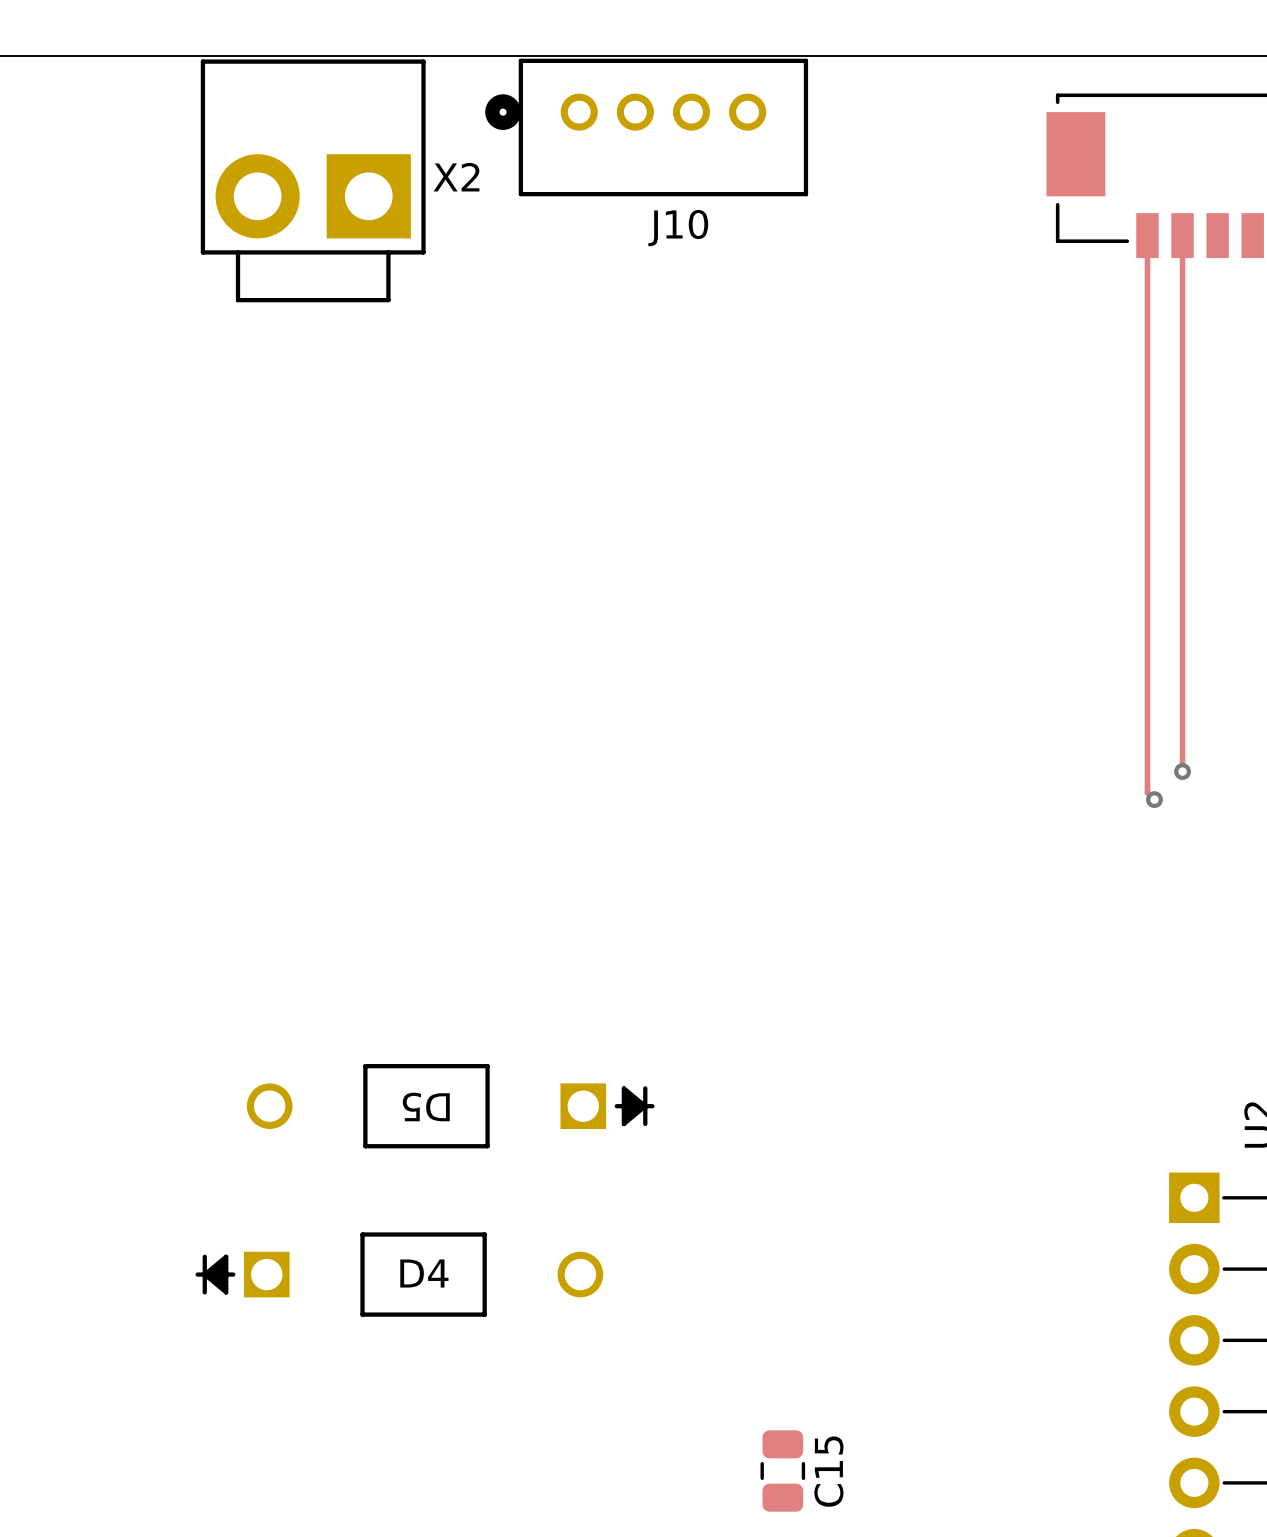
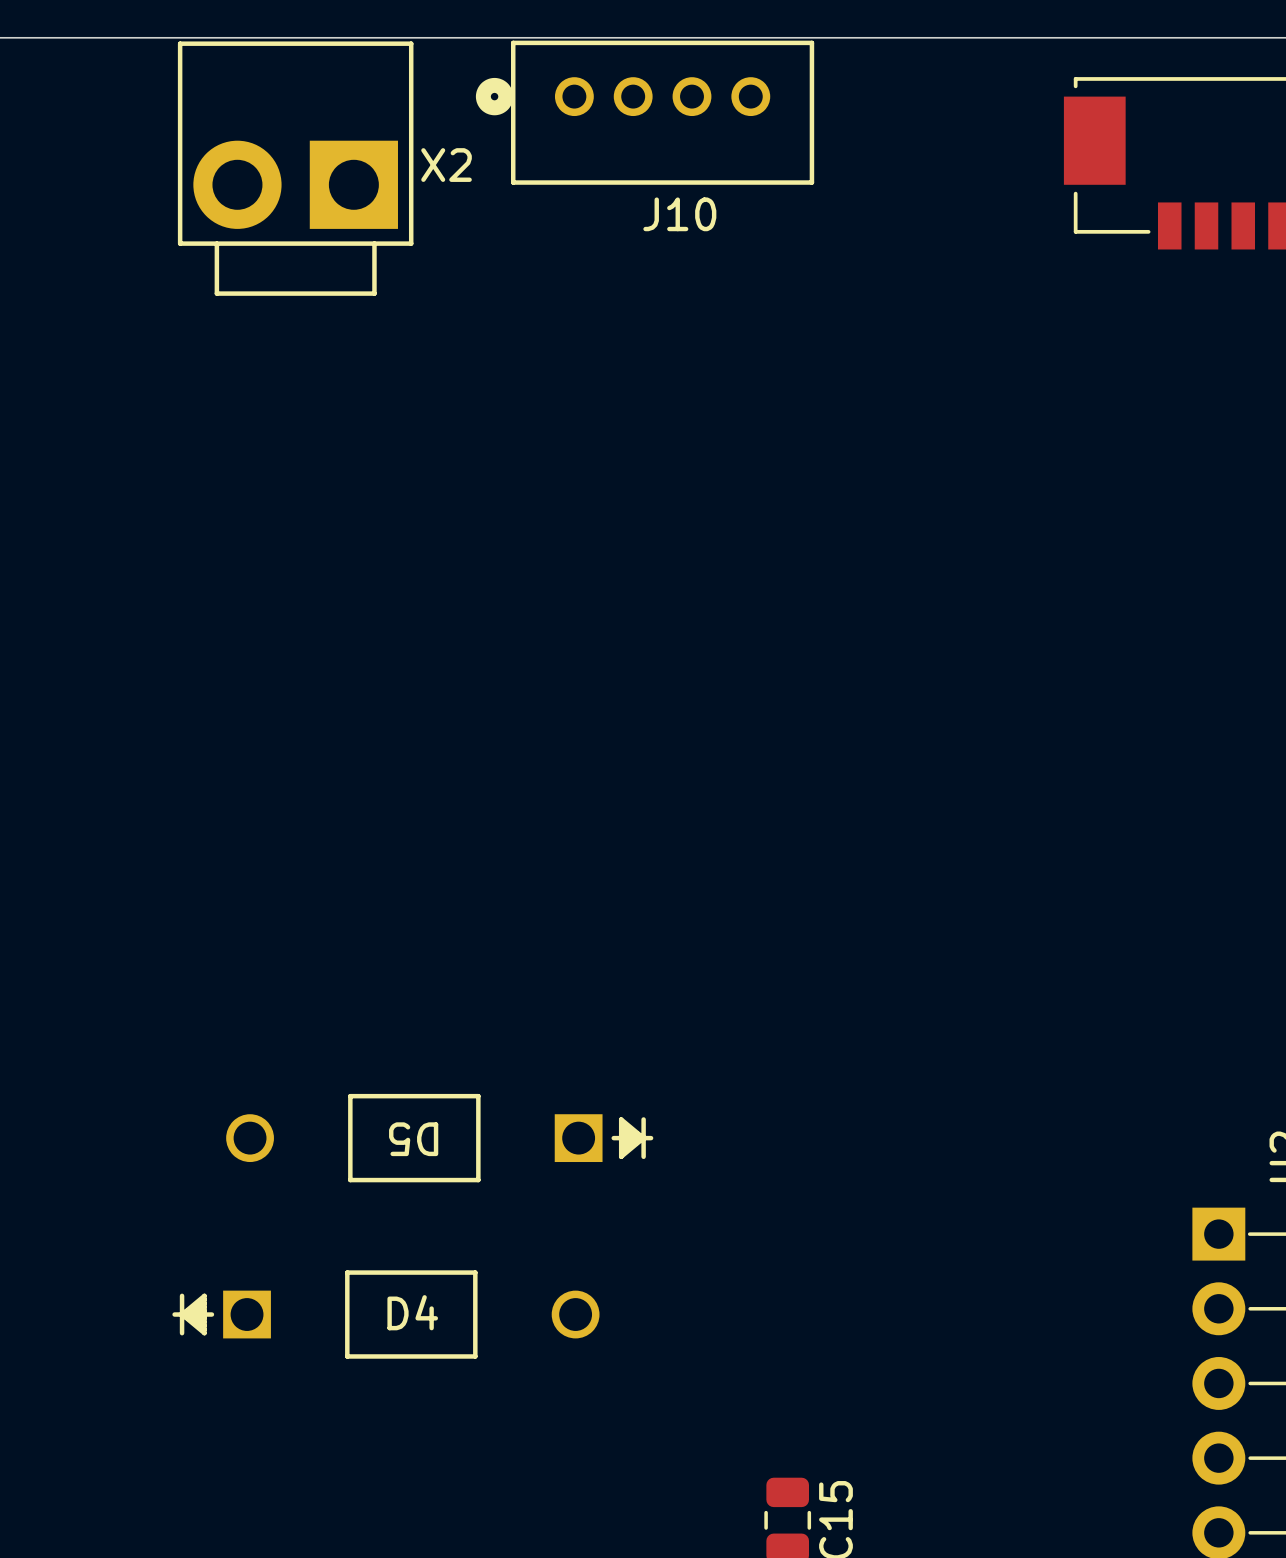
track: (1147, 235) (1147, 792) (1154, 799) -> none
track: (1182, 235) (1182, 771) -> none
via: (1182, 771) -> none
via: (1154, 799) -> none

